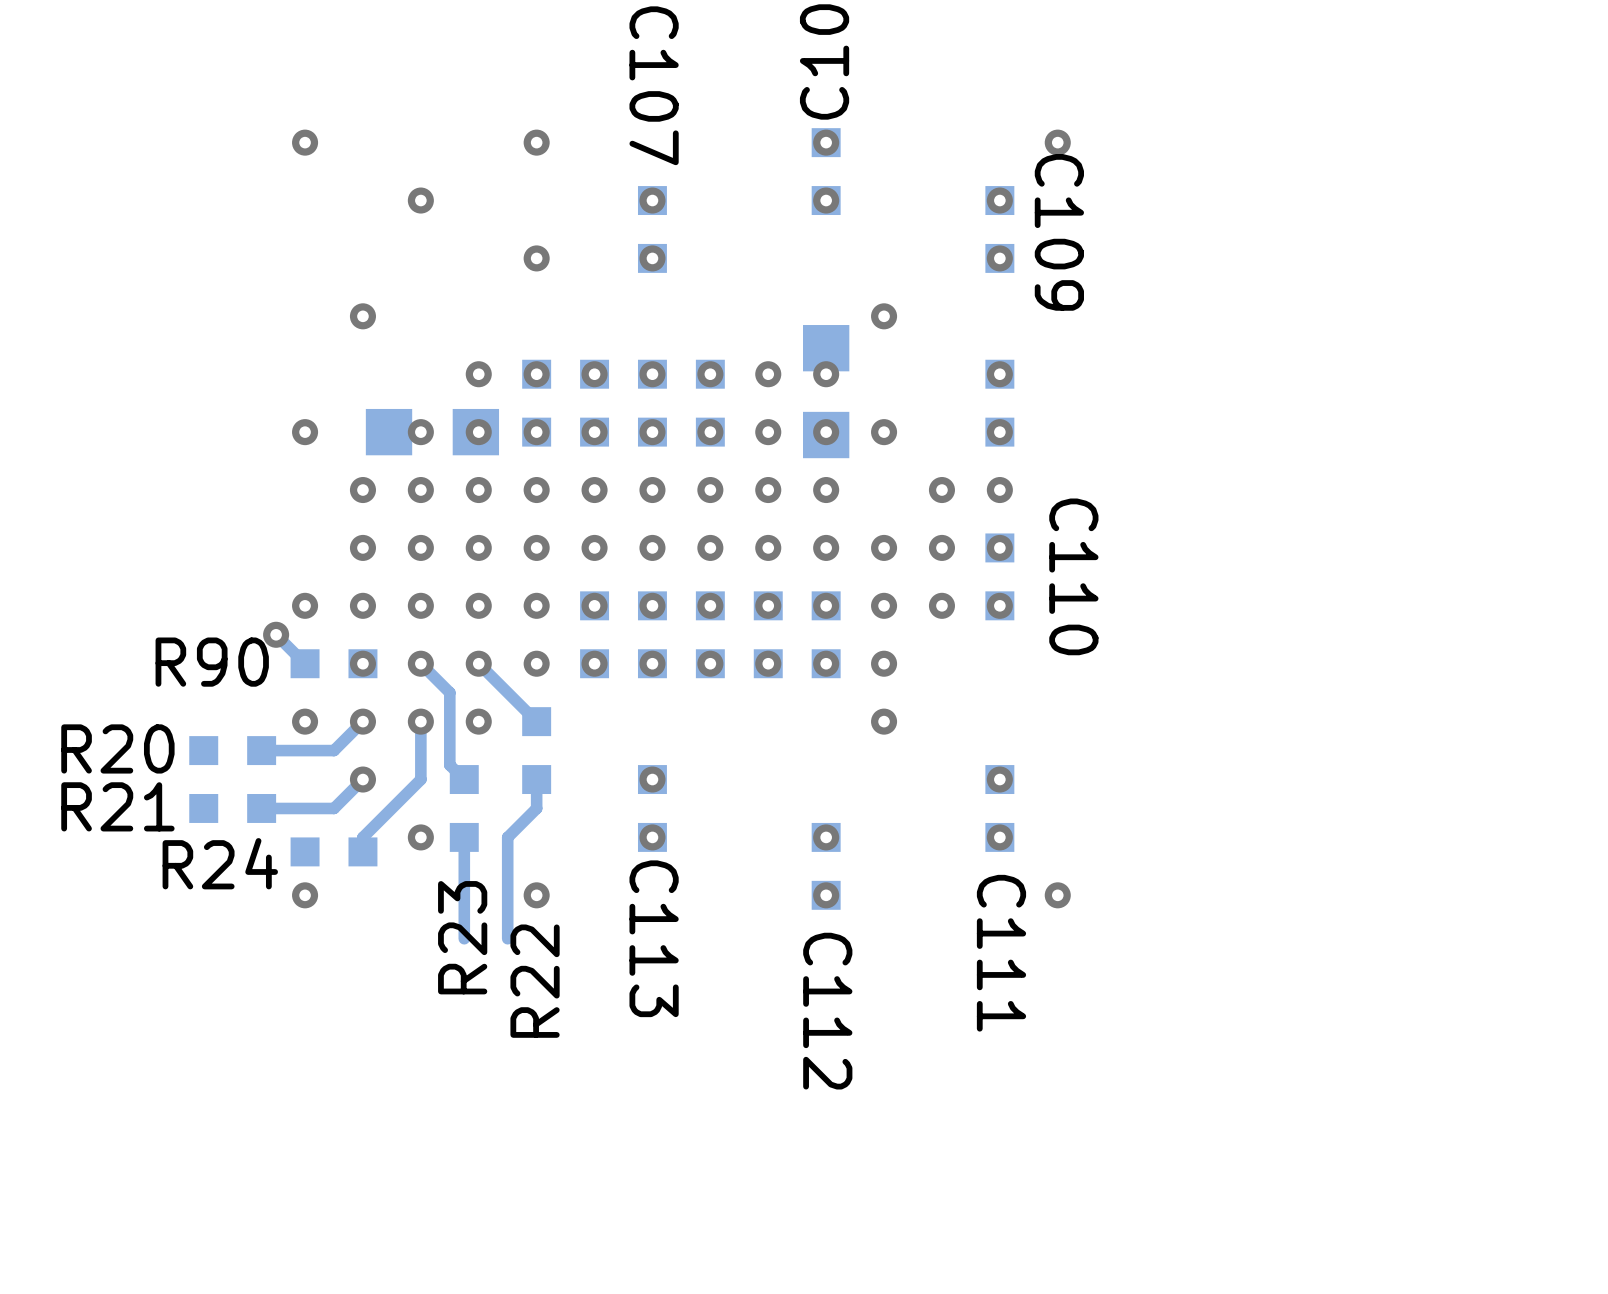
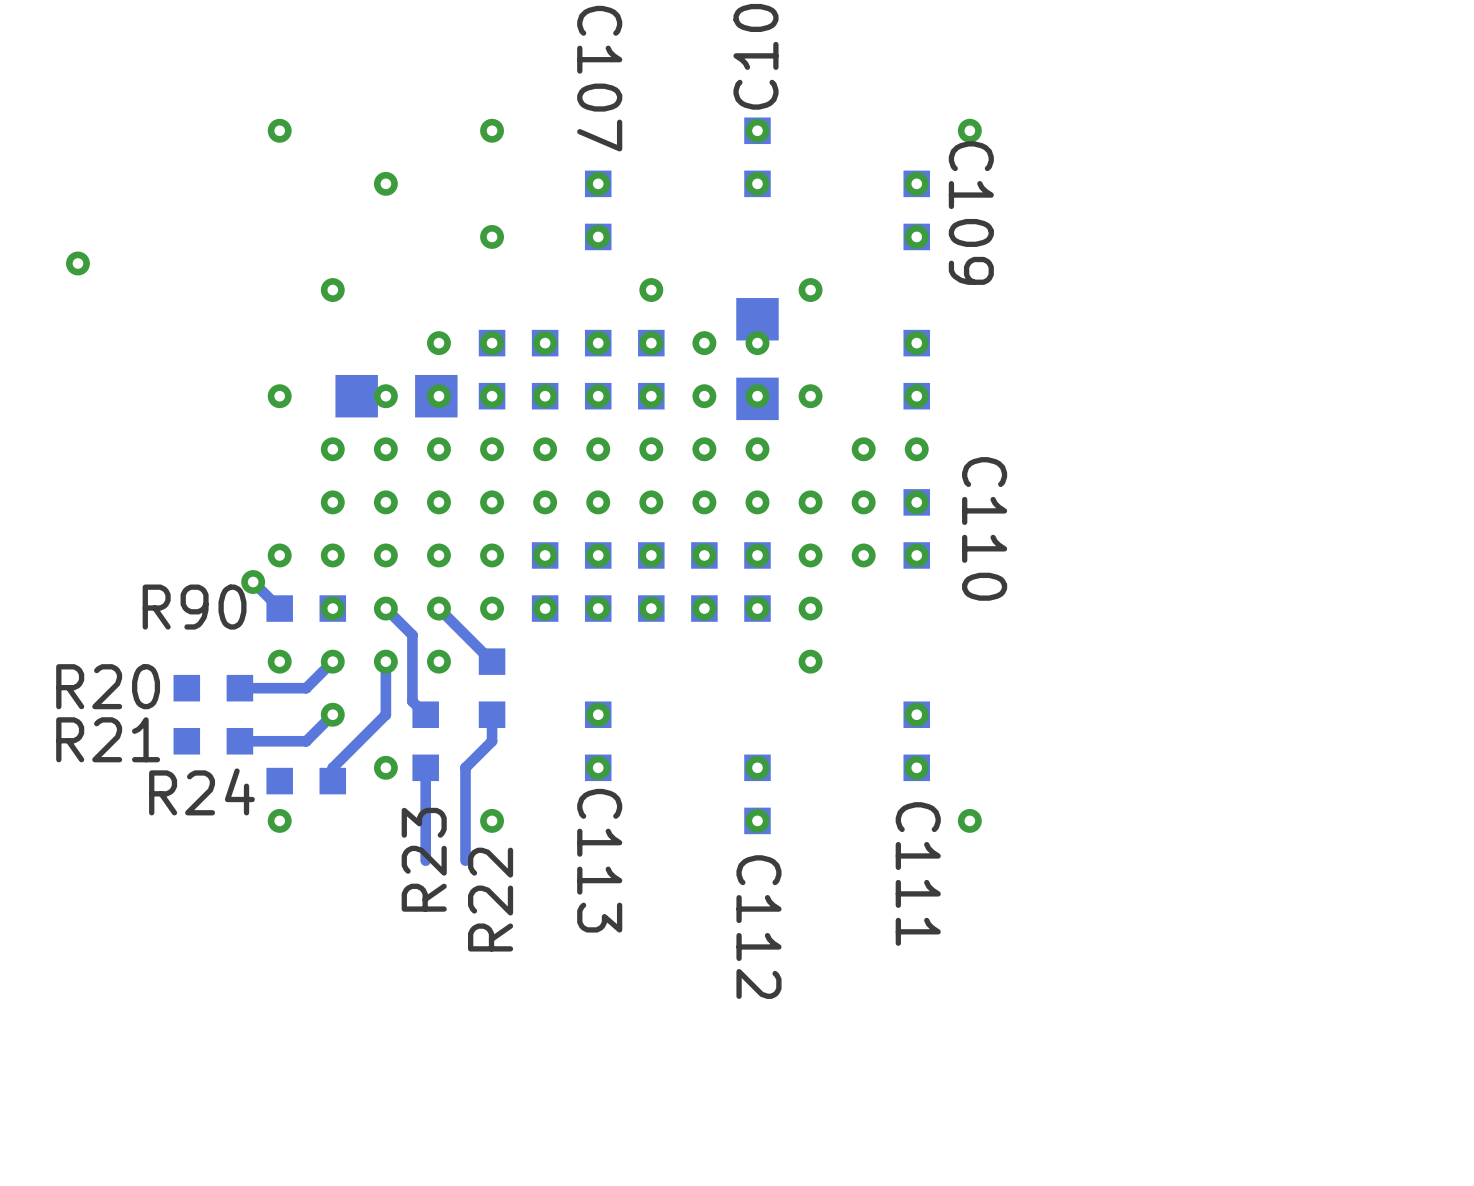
via: none -> (77, 263)
via: none -> (651, 290)

